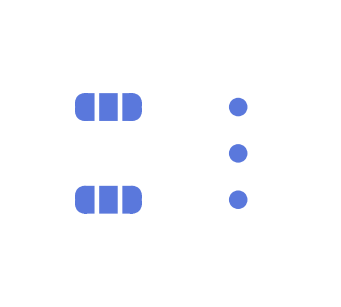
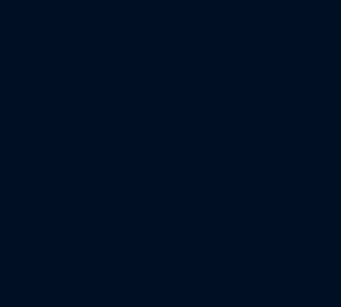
part: (108, 107) -> none
part: (238, 107) -> none
part: (238, 153) -> none
part: (108, 199) -> none
part: (238, 199) -> none

